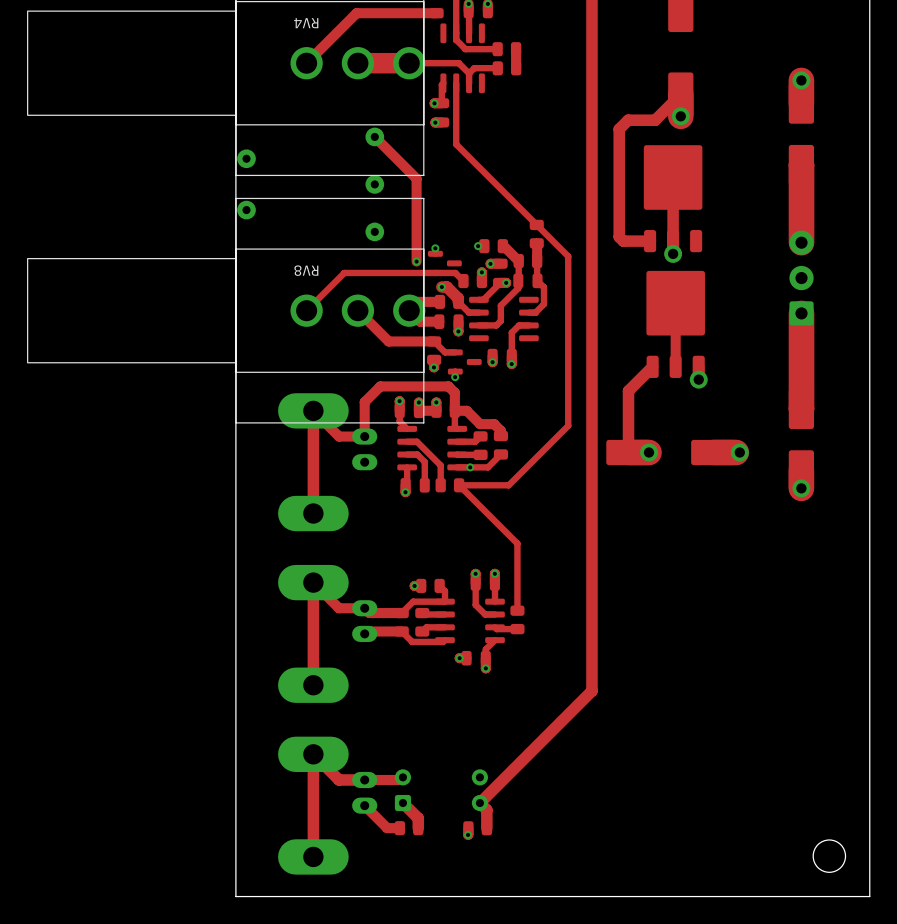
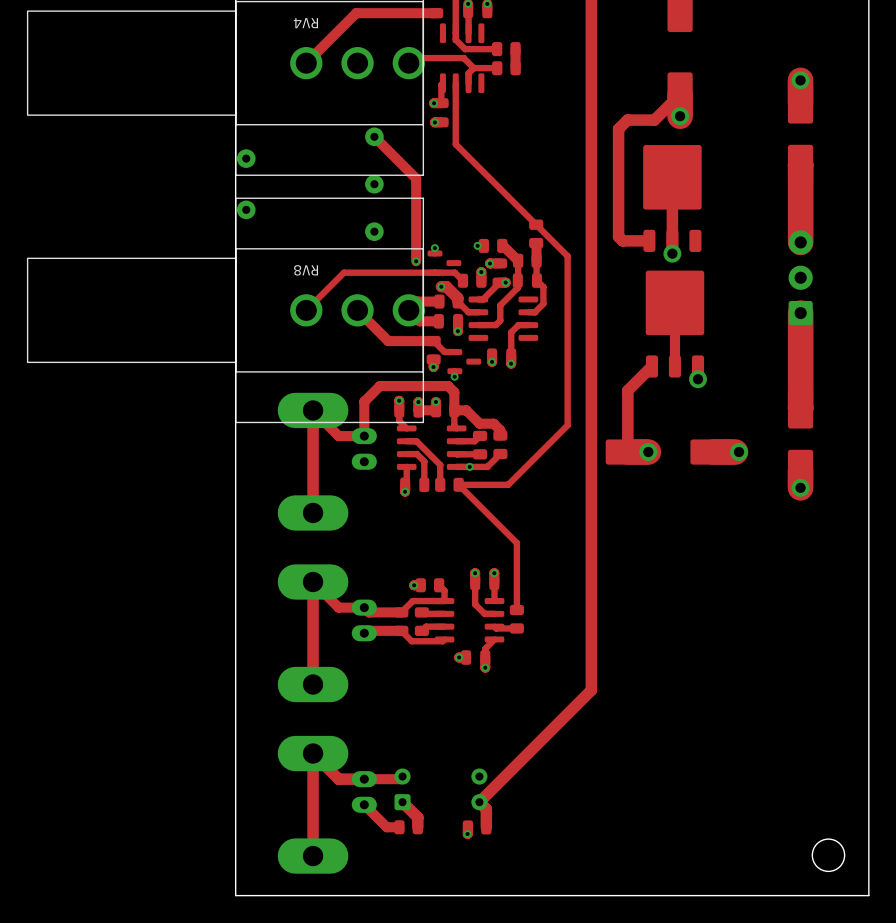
top track: none -> (408, 58) (463, 58) (473, 68)
top track: (357, 63) (458, 63) (469, 73) -> none

